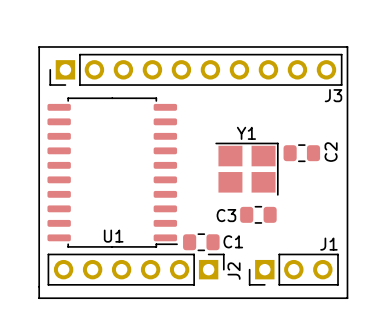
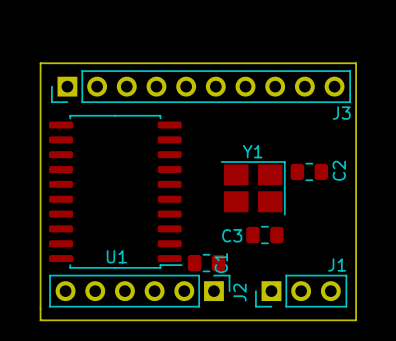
C1 name rotation: 0° (233, 241) -> 90° counterclockwise (221, 263)

